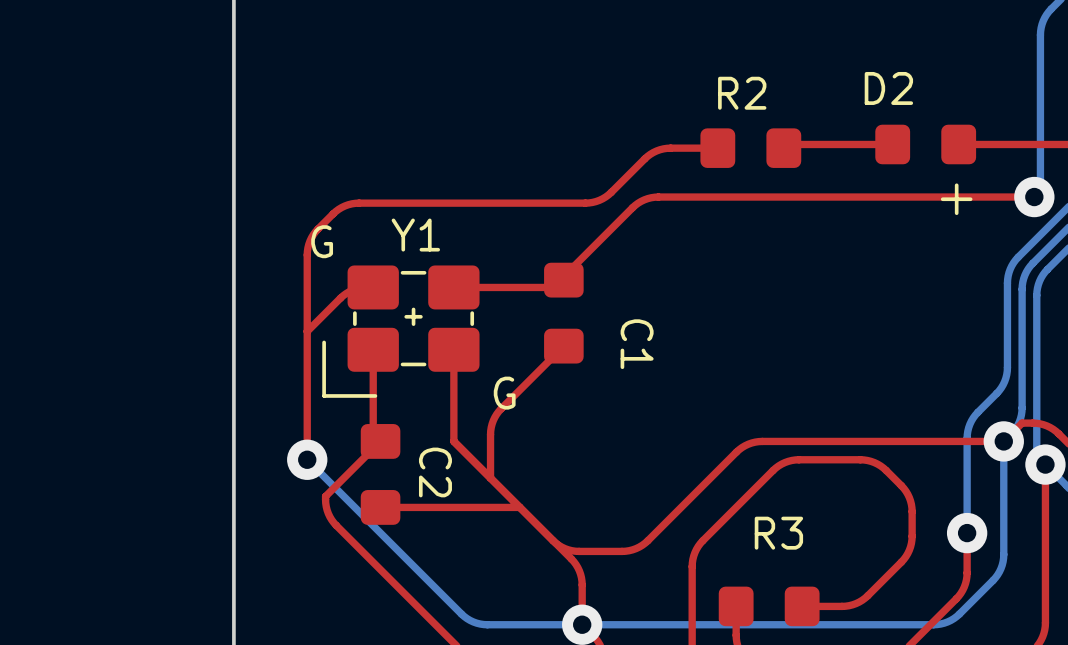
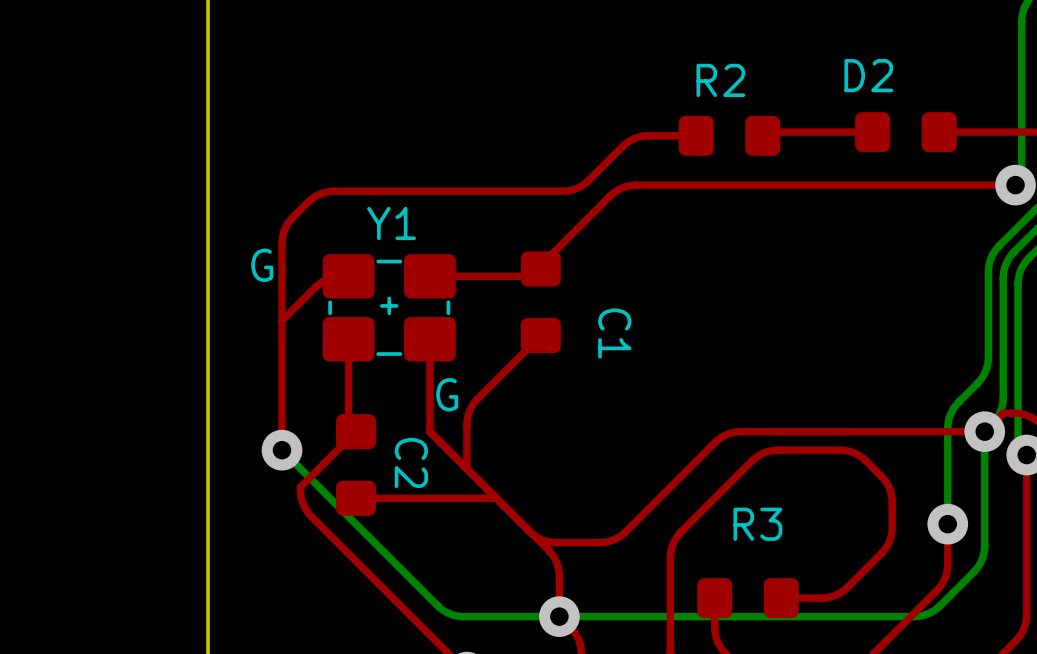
part text: + (956, 199) -> none
Y1 footprint: [322, 265, 480, 398] -> [322, 254, 456, 362]

